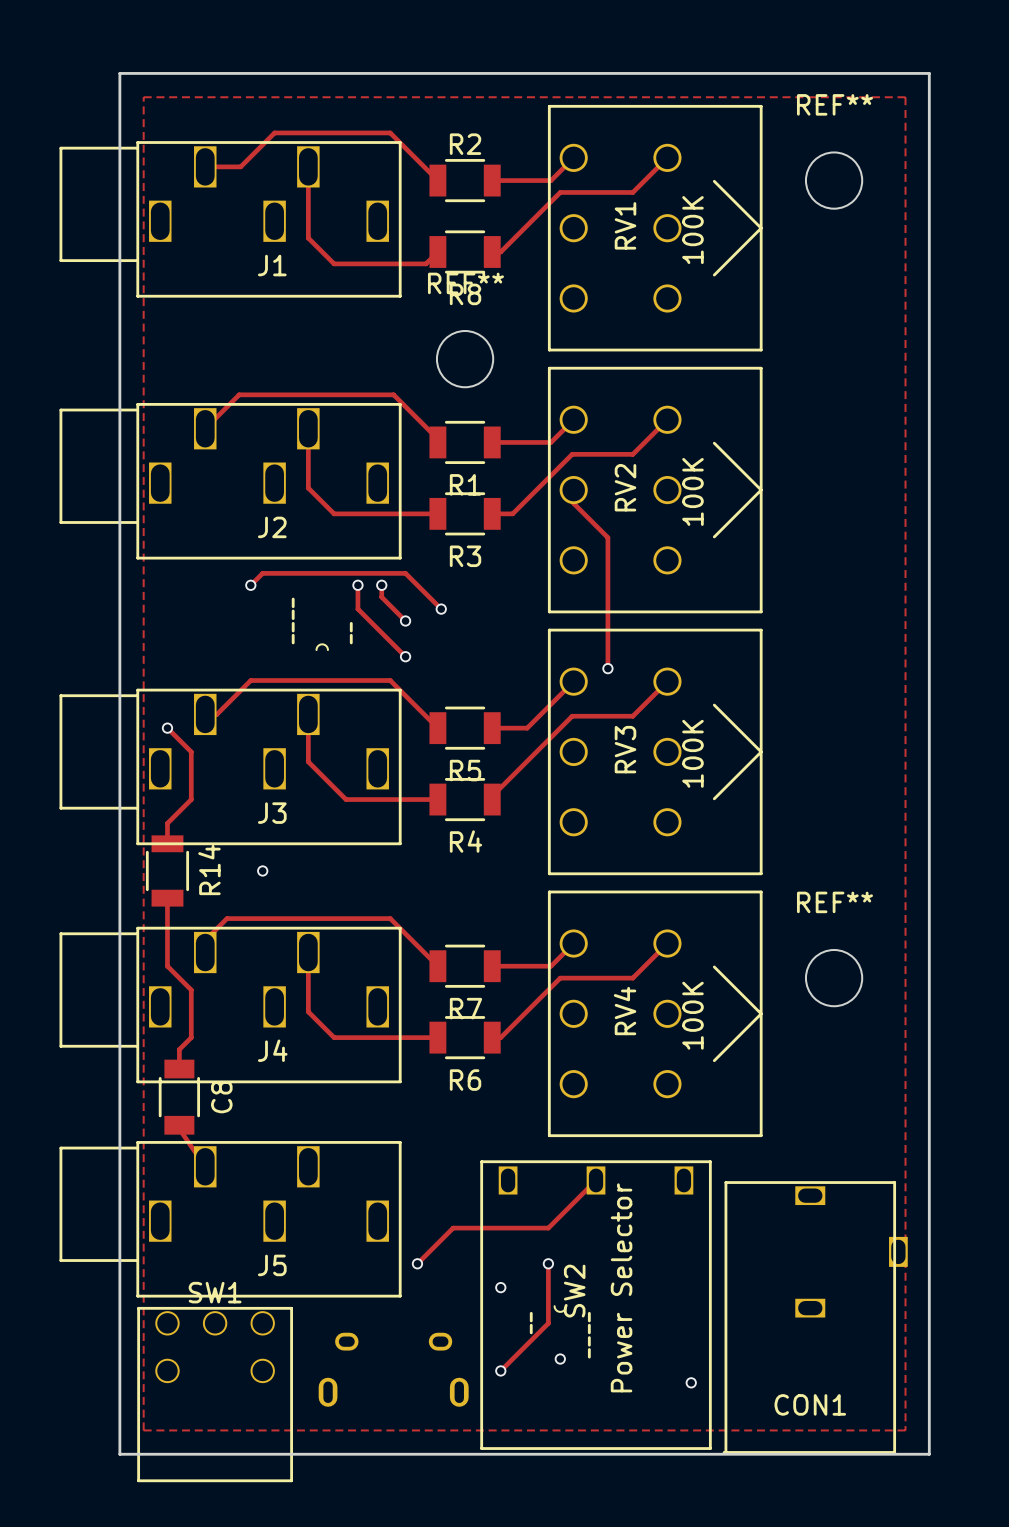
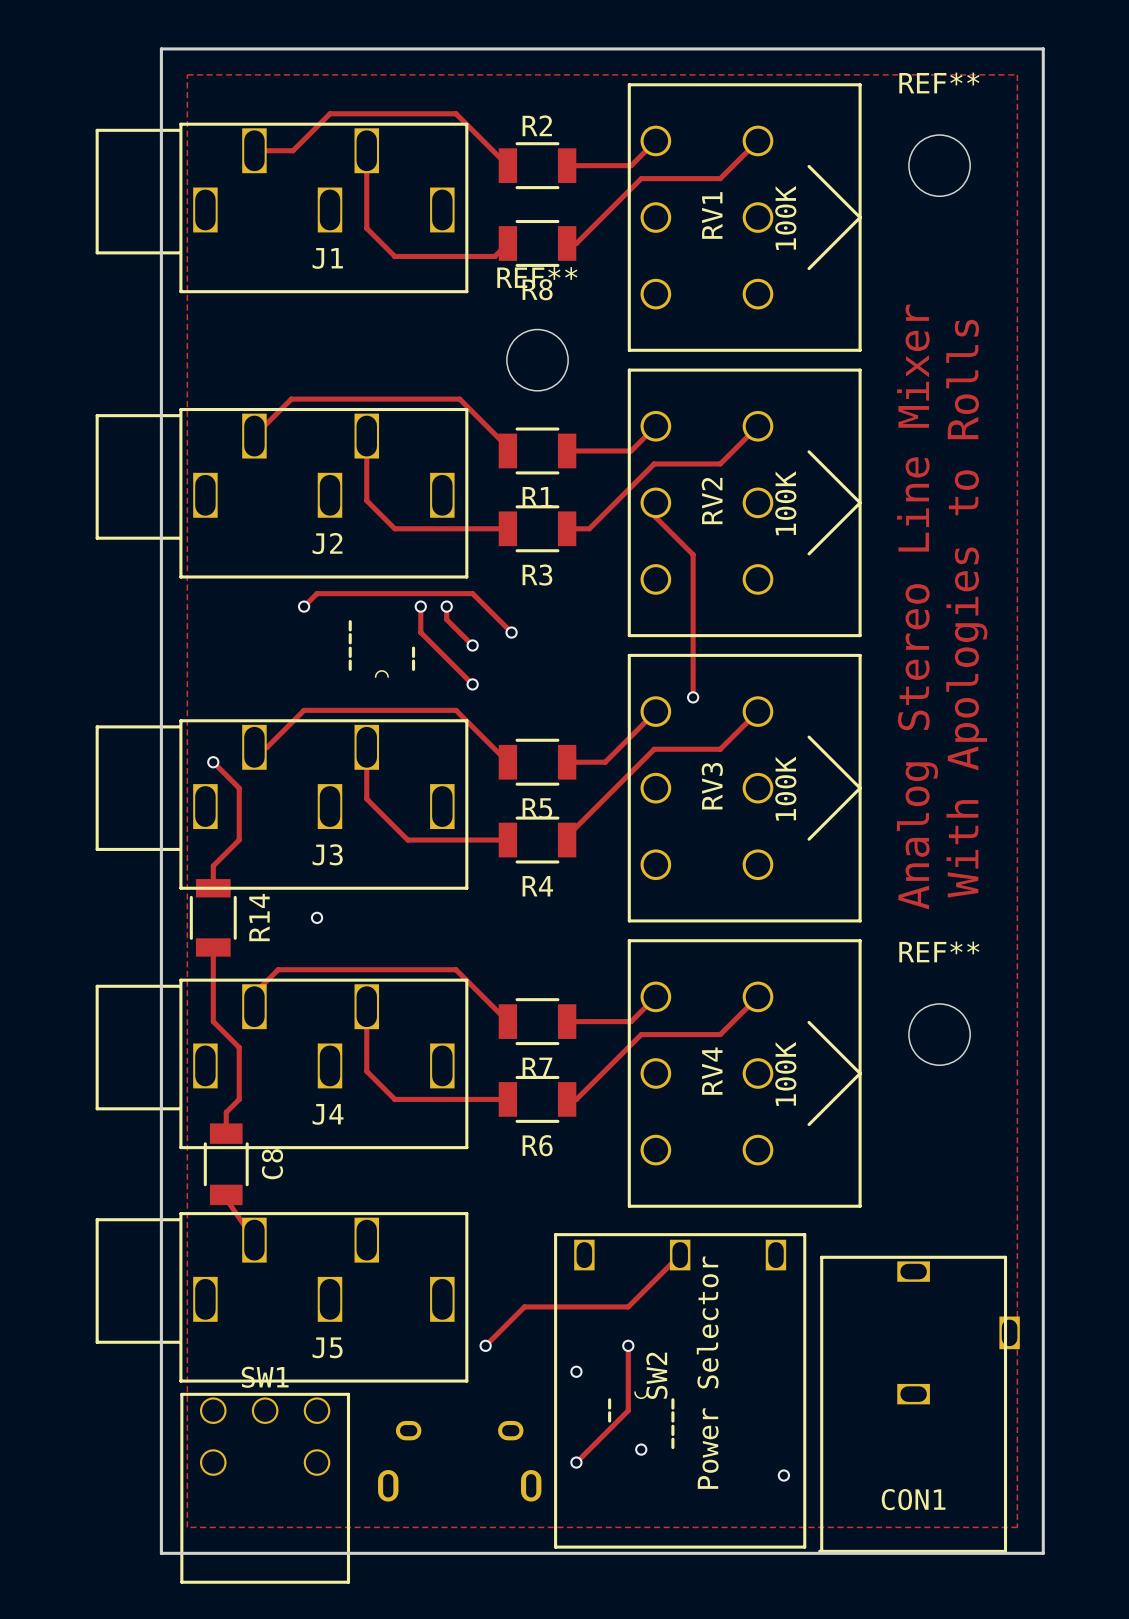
text: none -> Analog Stereo Line Mixer (917, 607)
text: none -> With Apologies to Rolls (966, 608)

